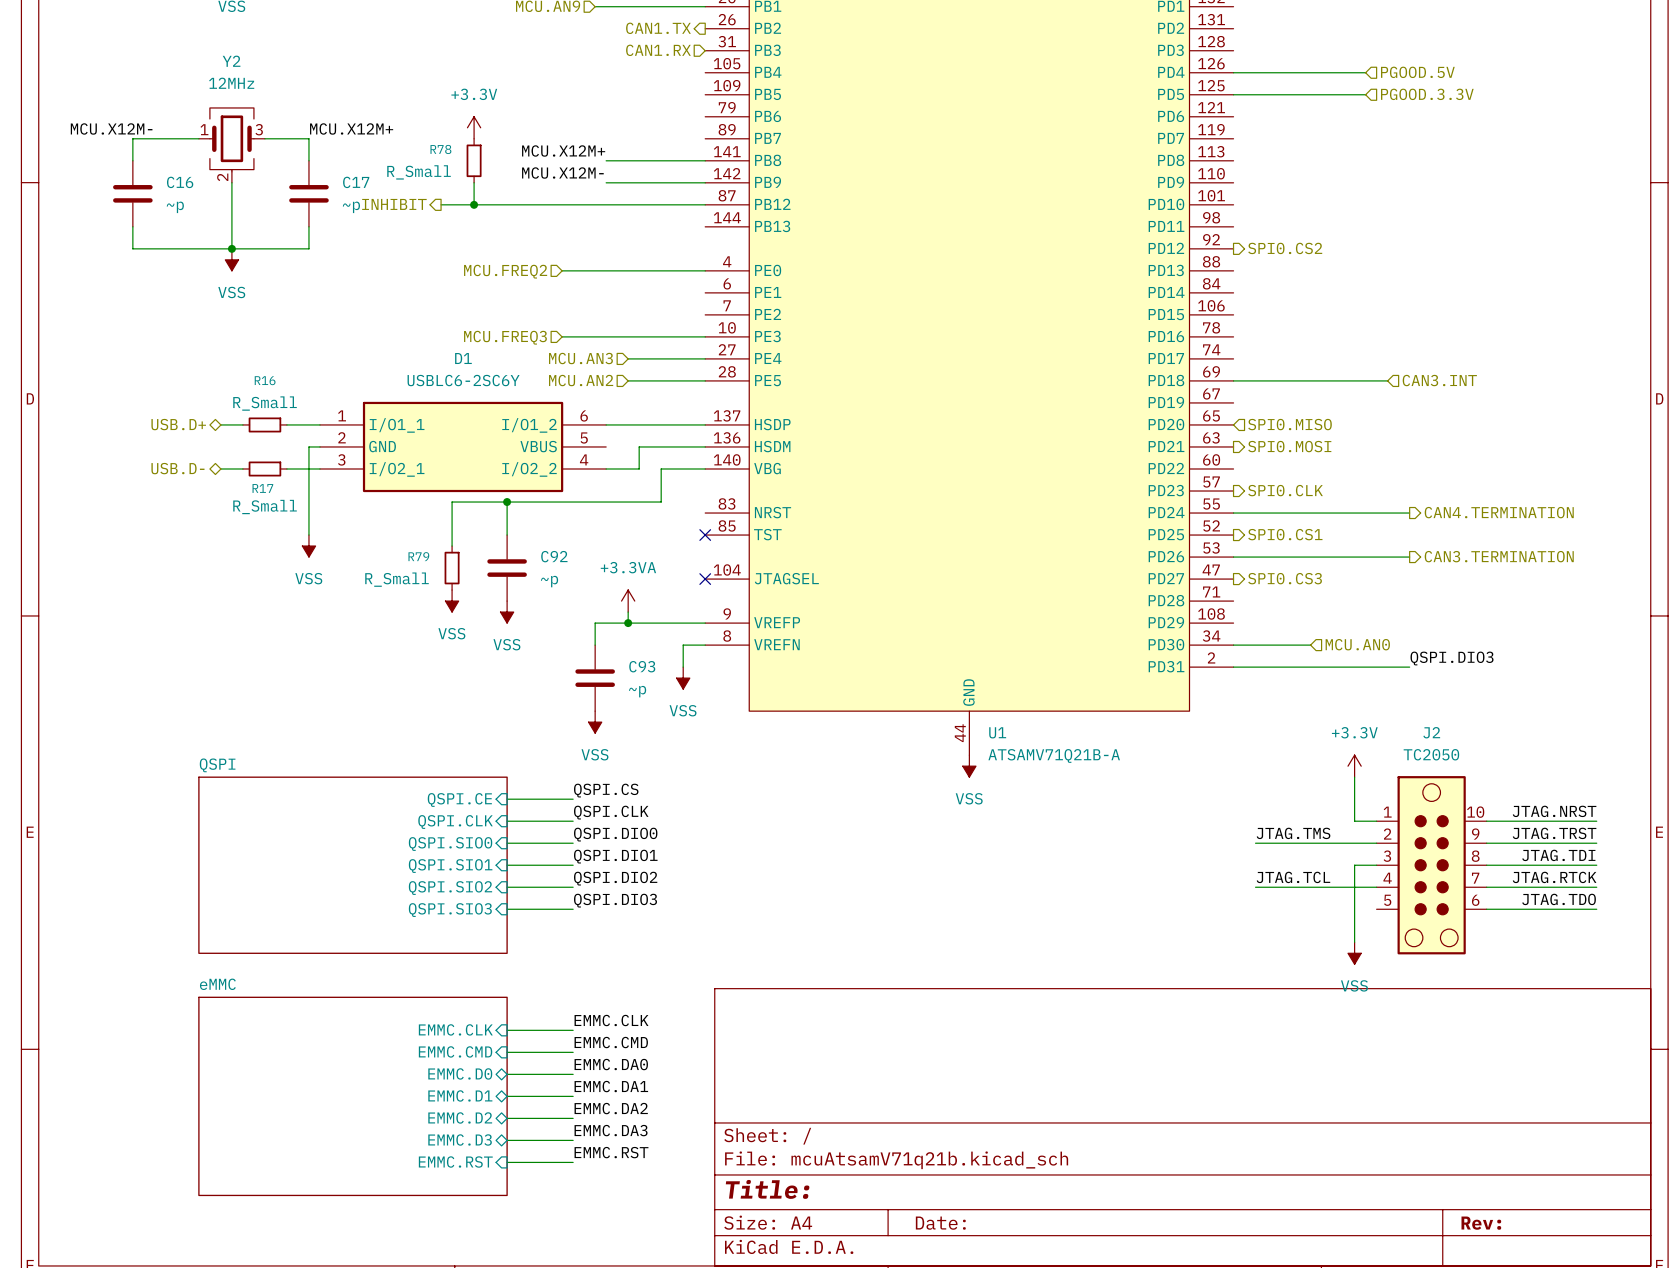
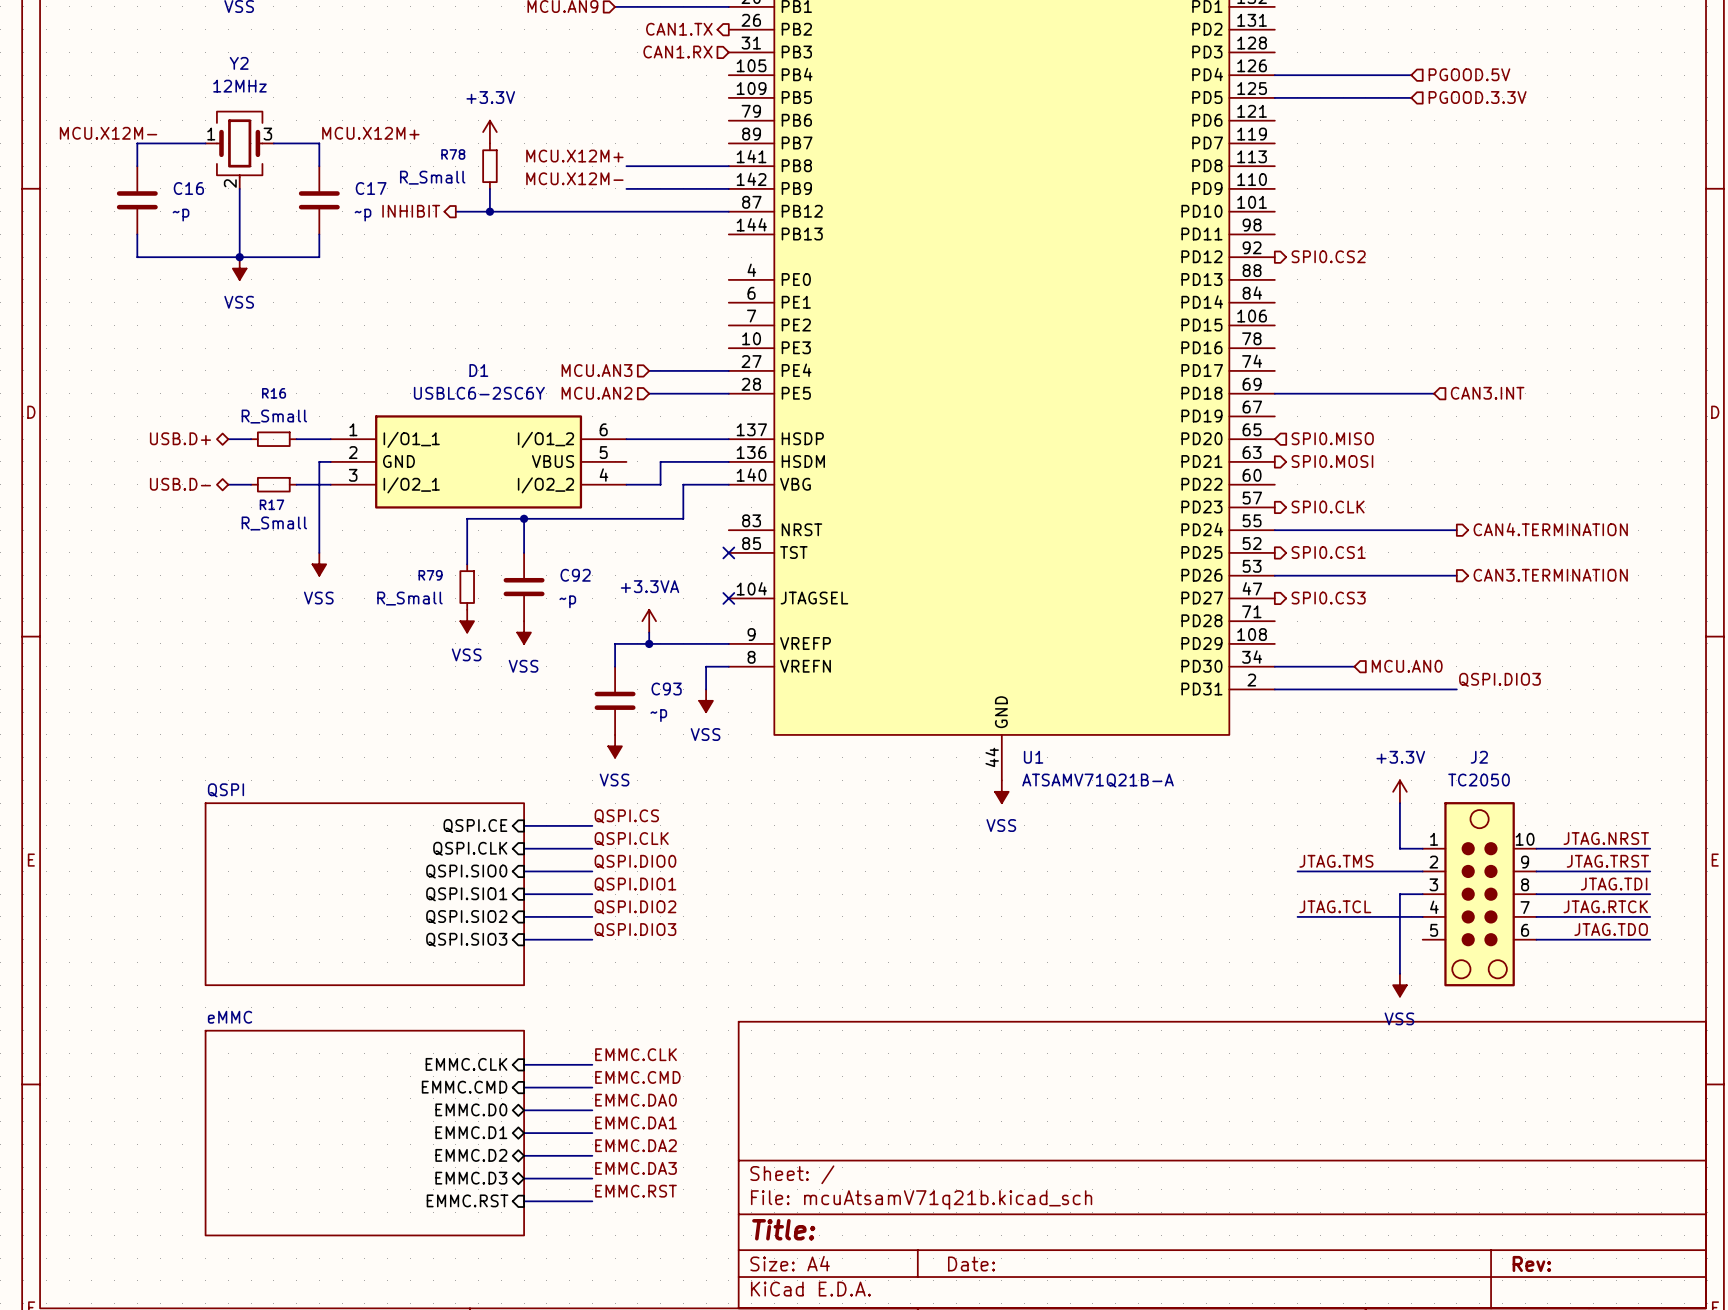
wire: (562, 270) (705, 270) -> none
hierarchical label: MCU.FREQ2 (505, 271) -> none
wire: (562, 336) (705, 336) -> none
hierarchical label: MCU.FREQ3 (505, 337) -> none

